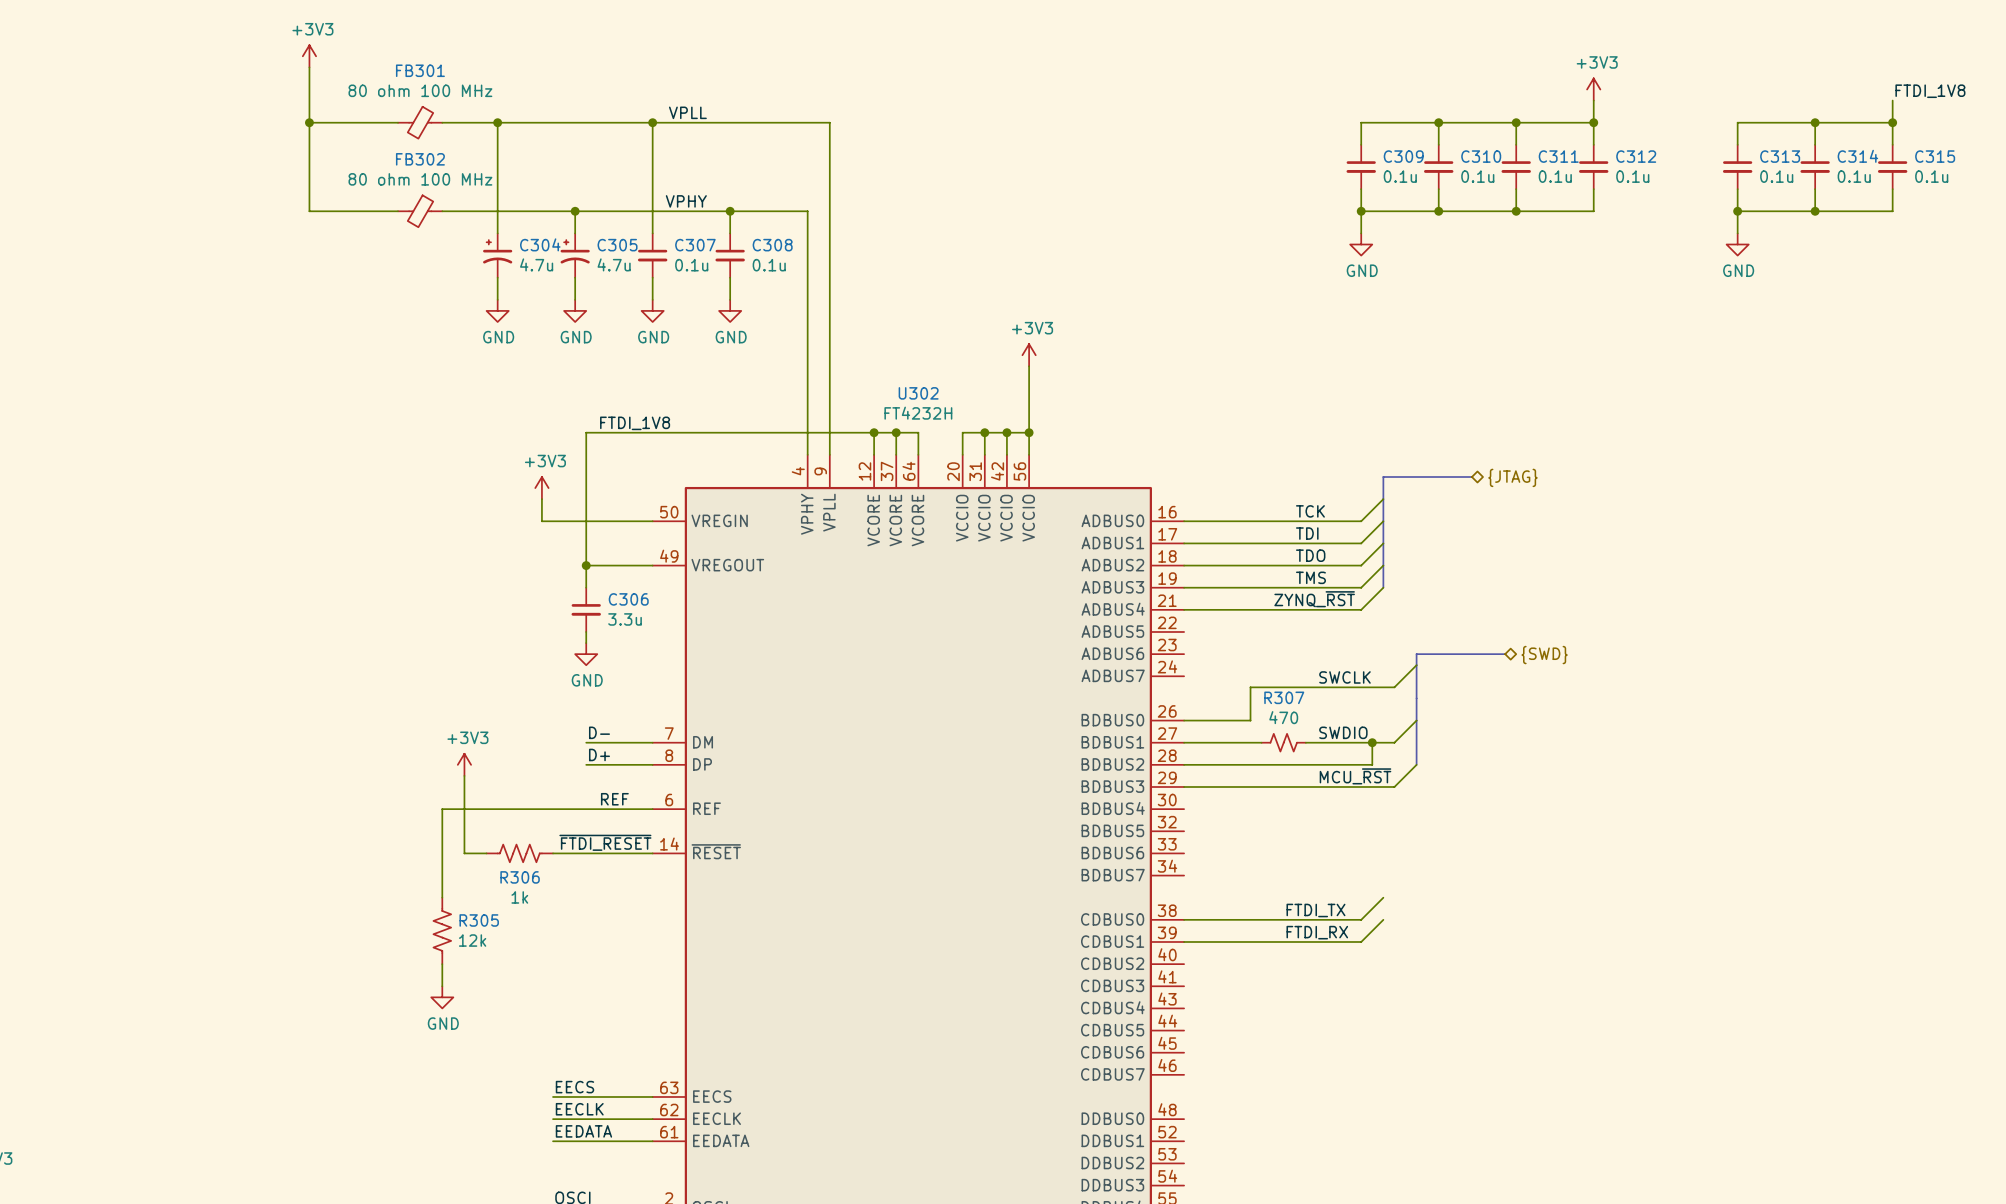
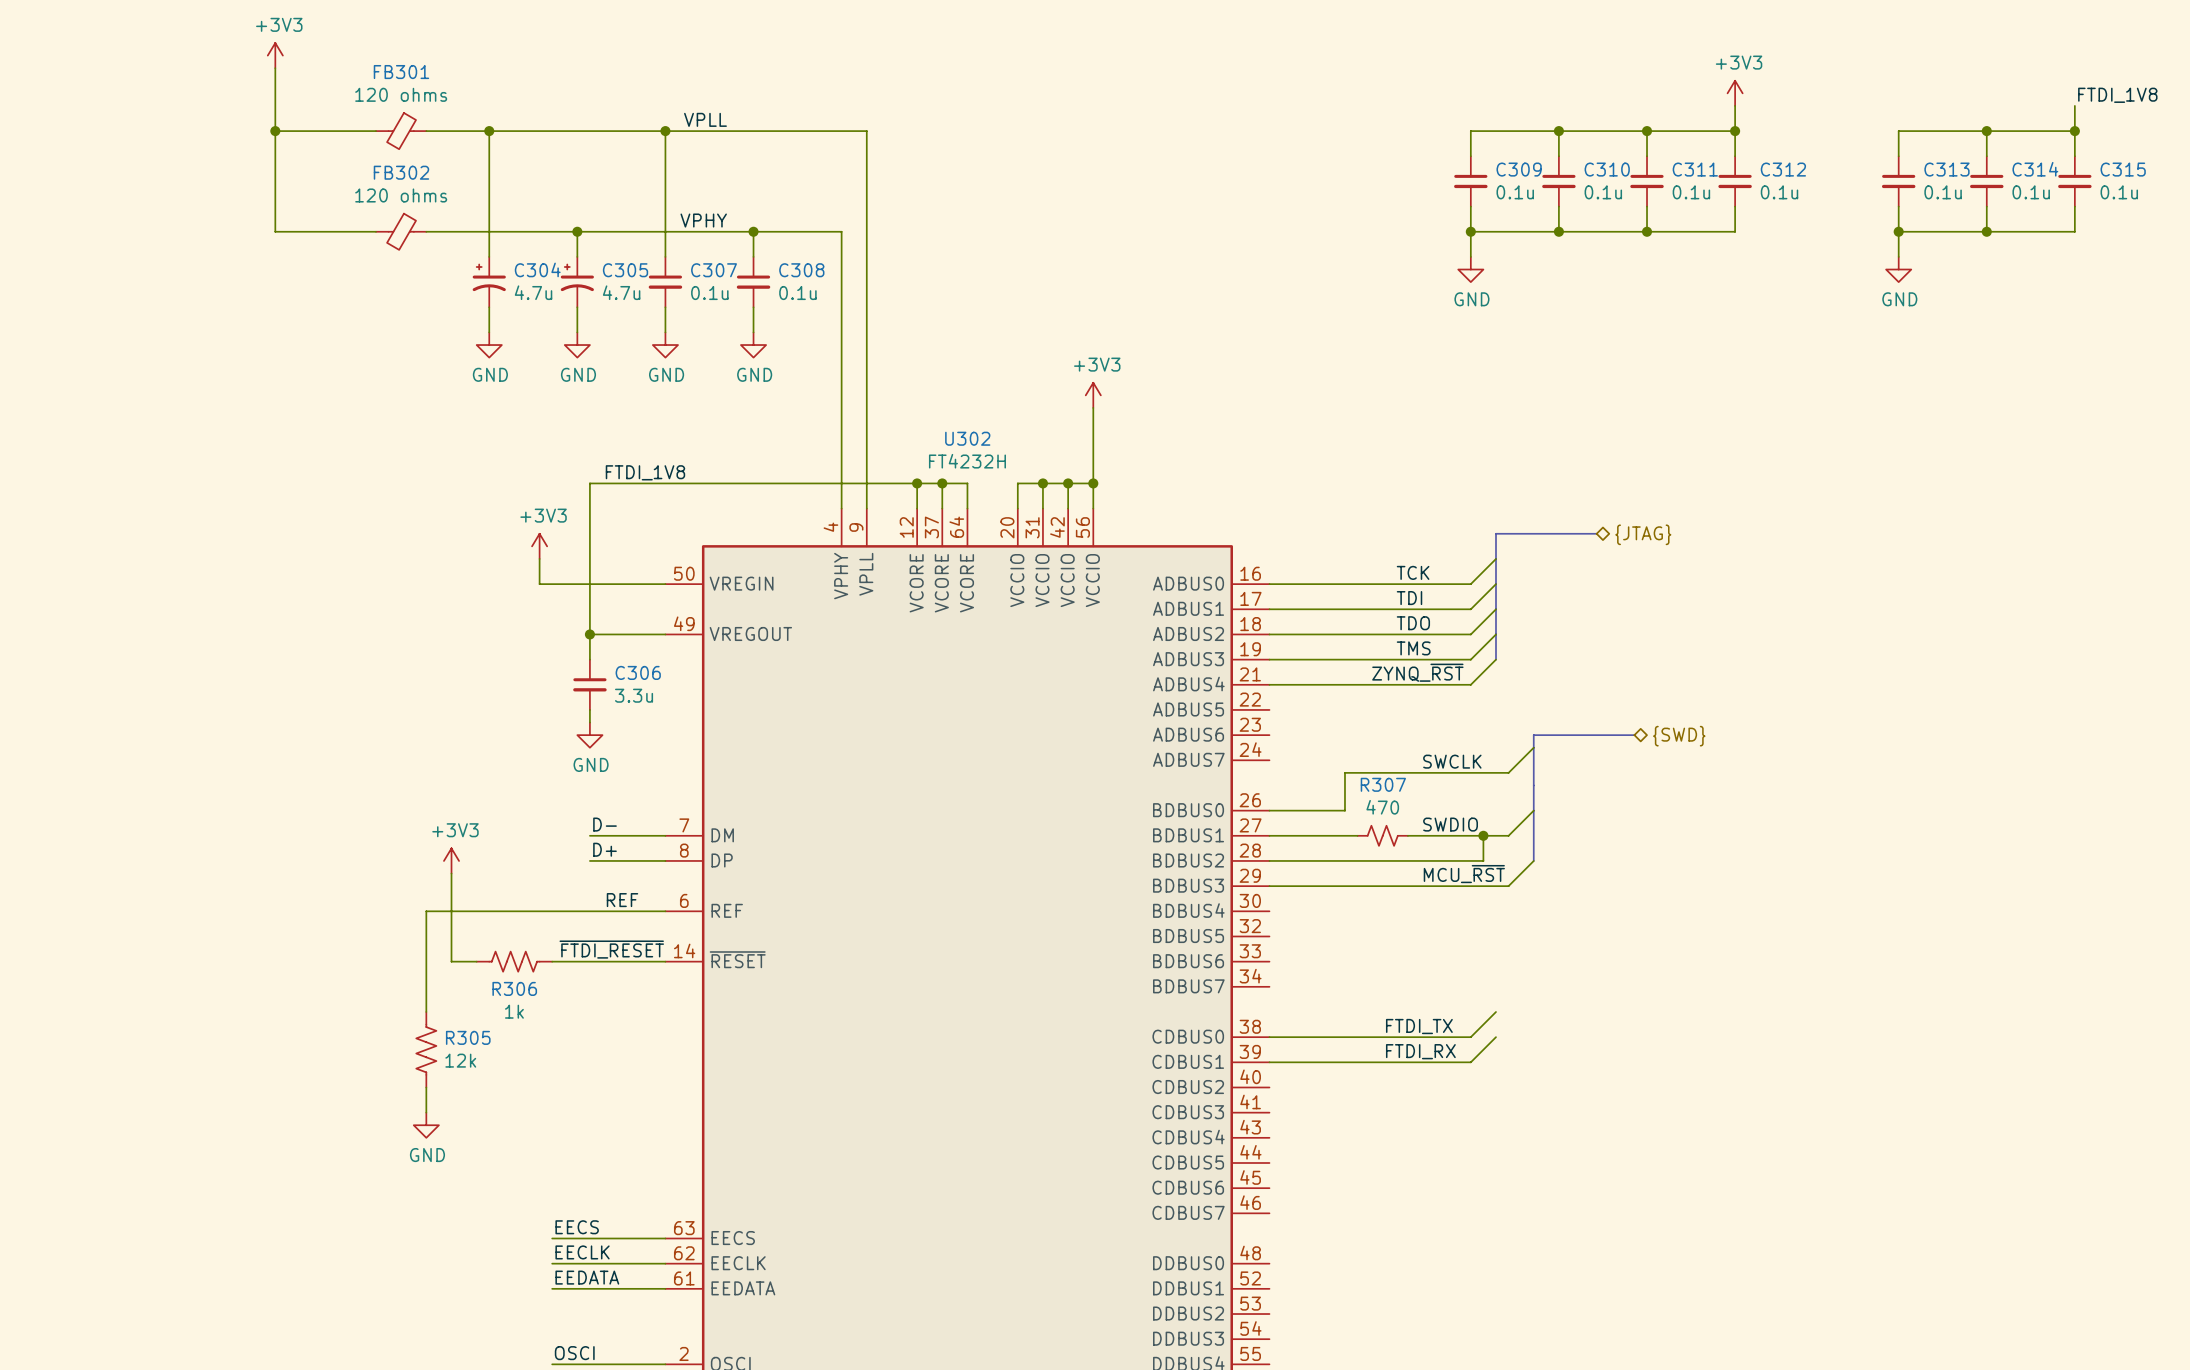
FB301 value: 80 ohm 100 MHz (420, 90) -> 120 ohms (401, 94)
FB302 value: 80 ohm 100 MHz (420, 179) -> 120 ohms (401, 195)

